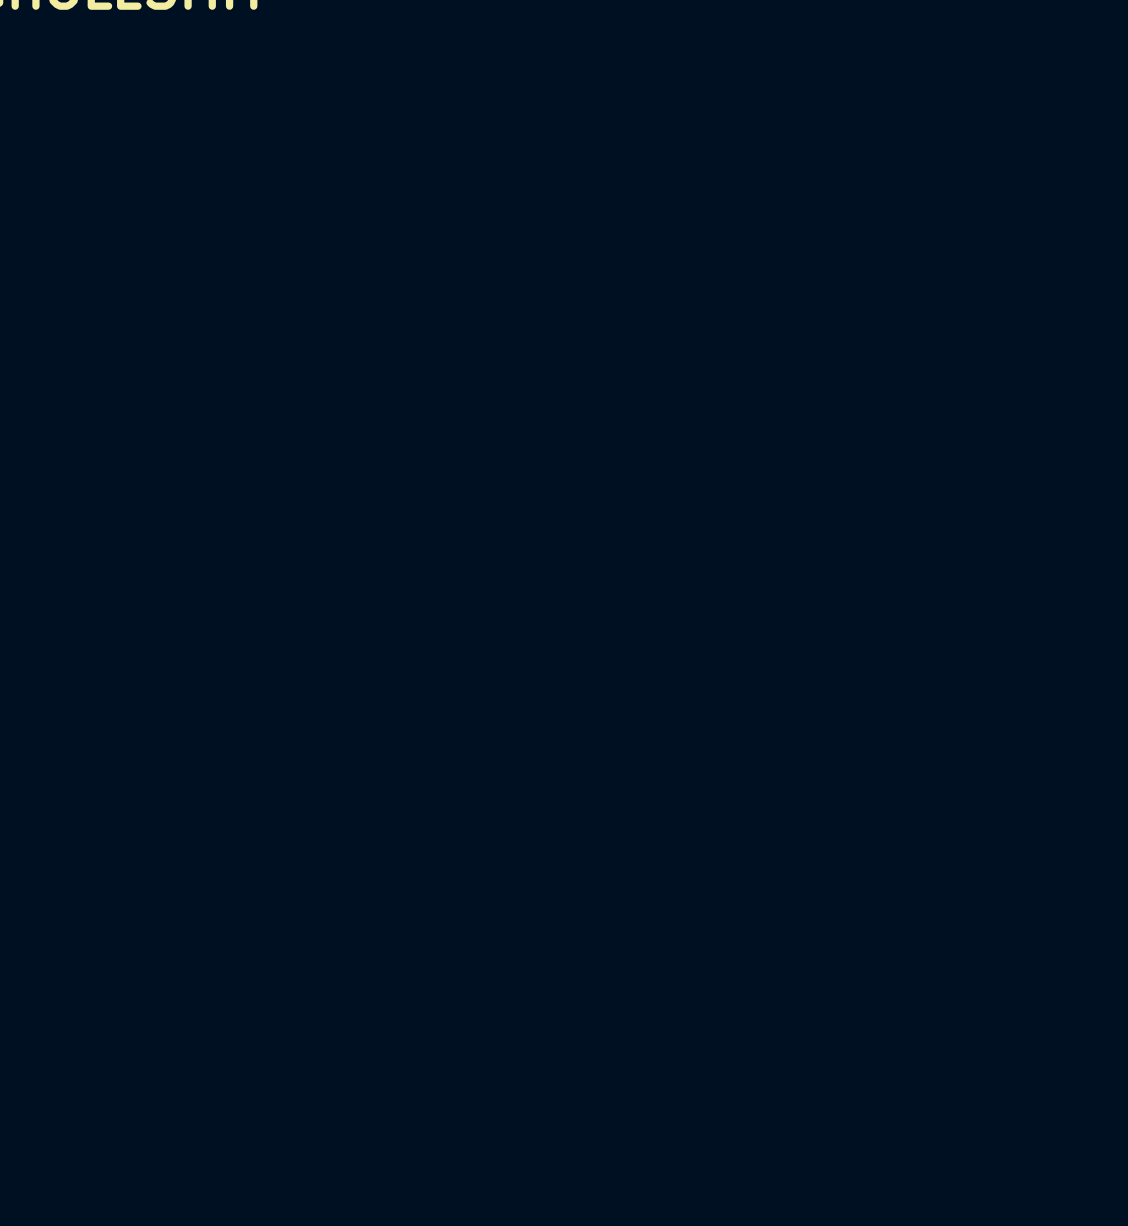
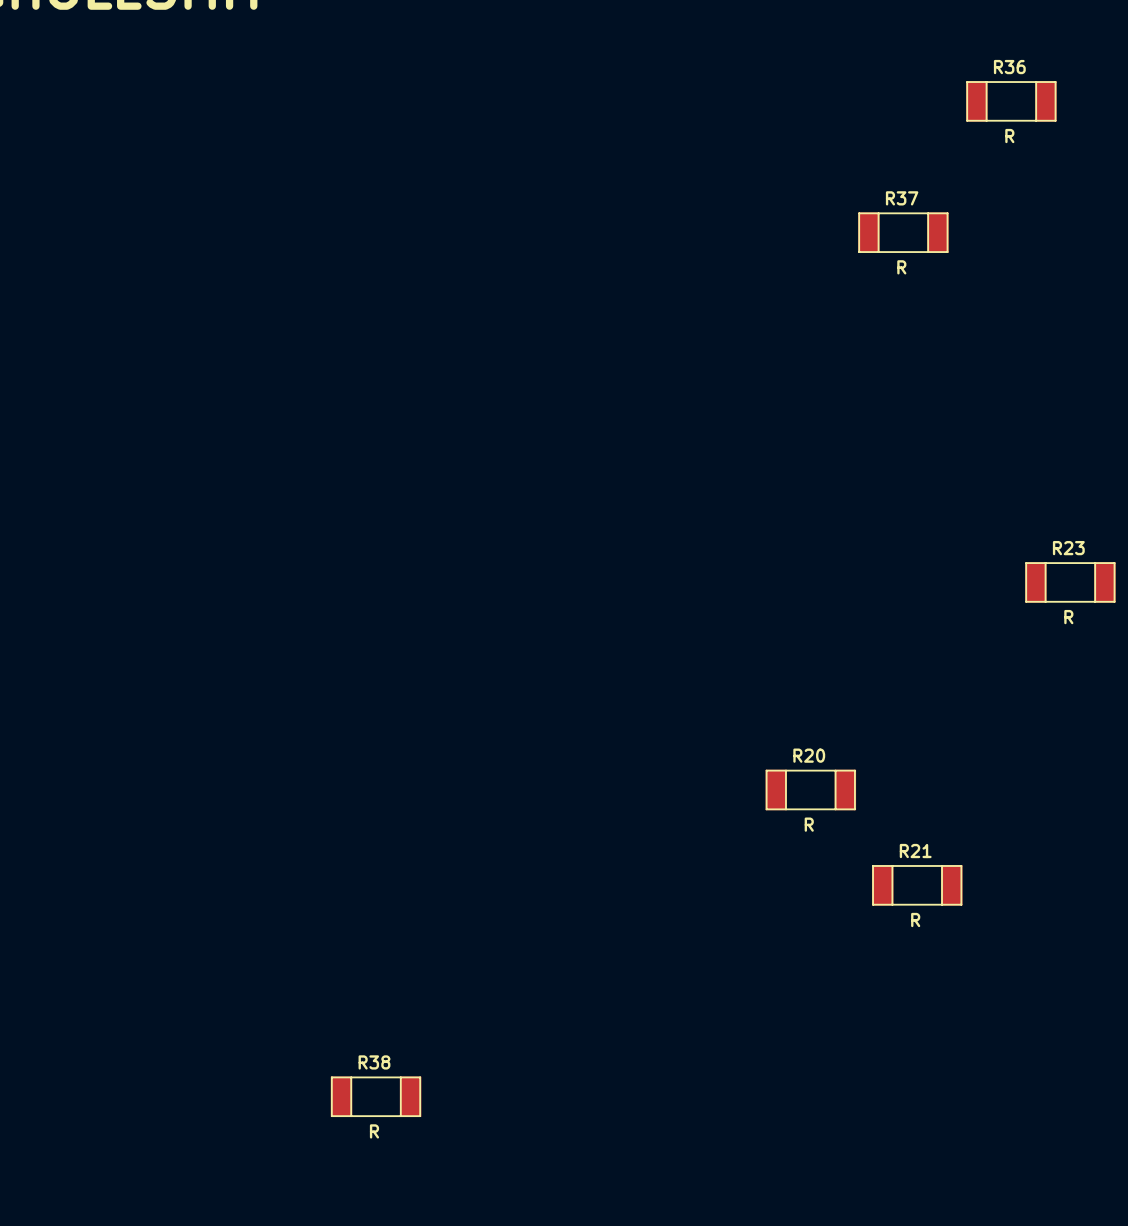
R36: none -> R (1011, 101)
R37: none -> R (903, 232)
R23: none -> R (1070, 582)
R20: none -> R (810, 789)
R21: none -> R (917, 885)
R38: none -> R (376, 1096)

